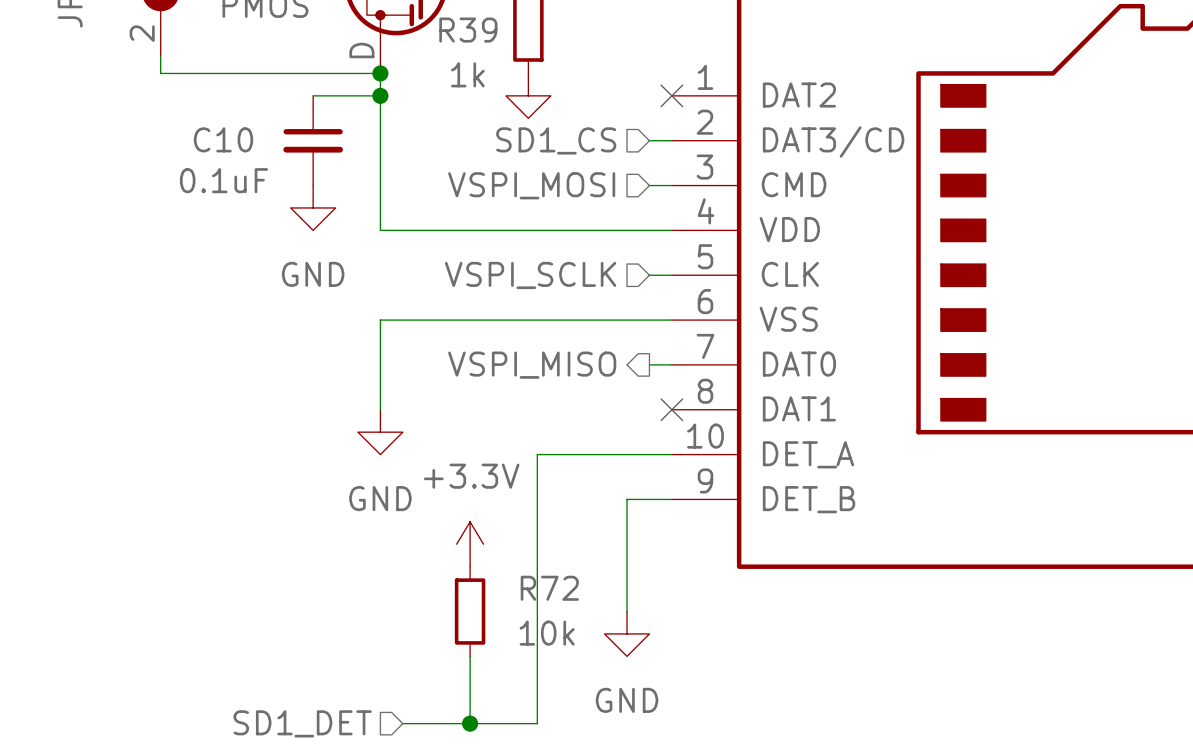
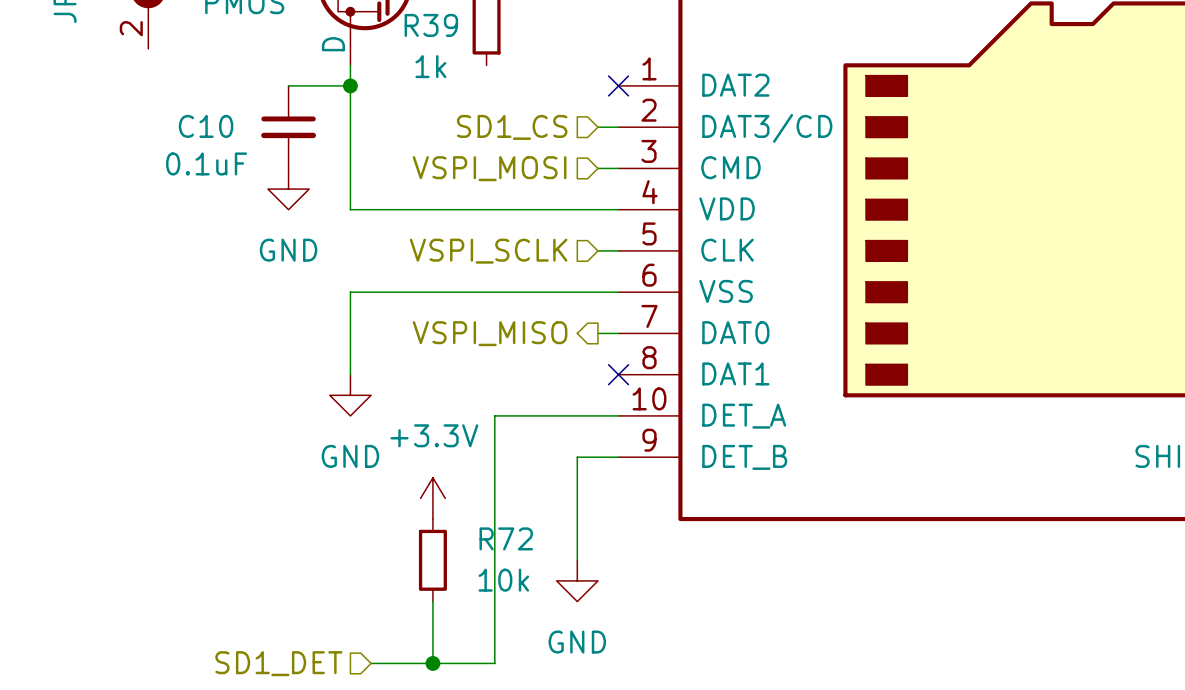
wire: (160, 55) (160, 73) (380, 73) -> none
junction: (380, 73) -> none
power symbol: (528, 95) -> none

